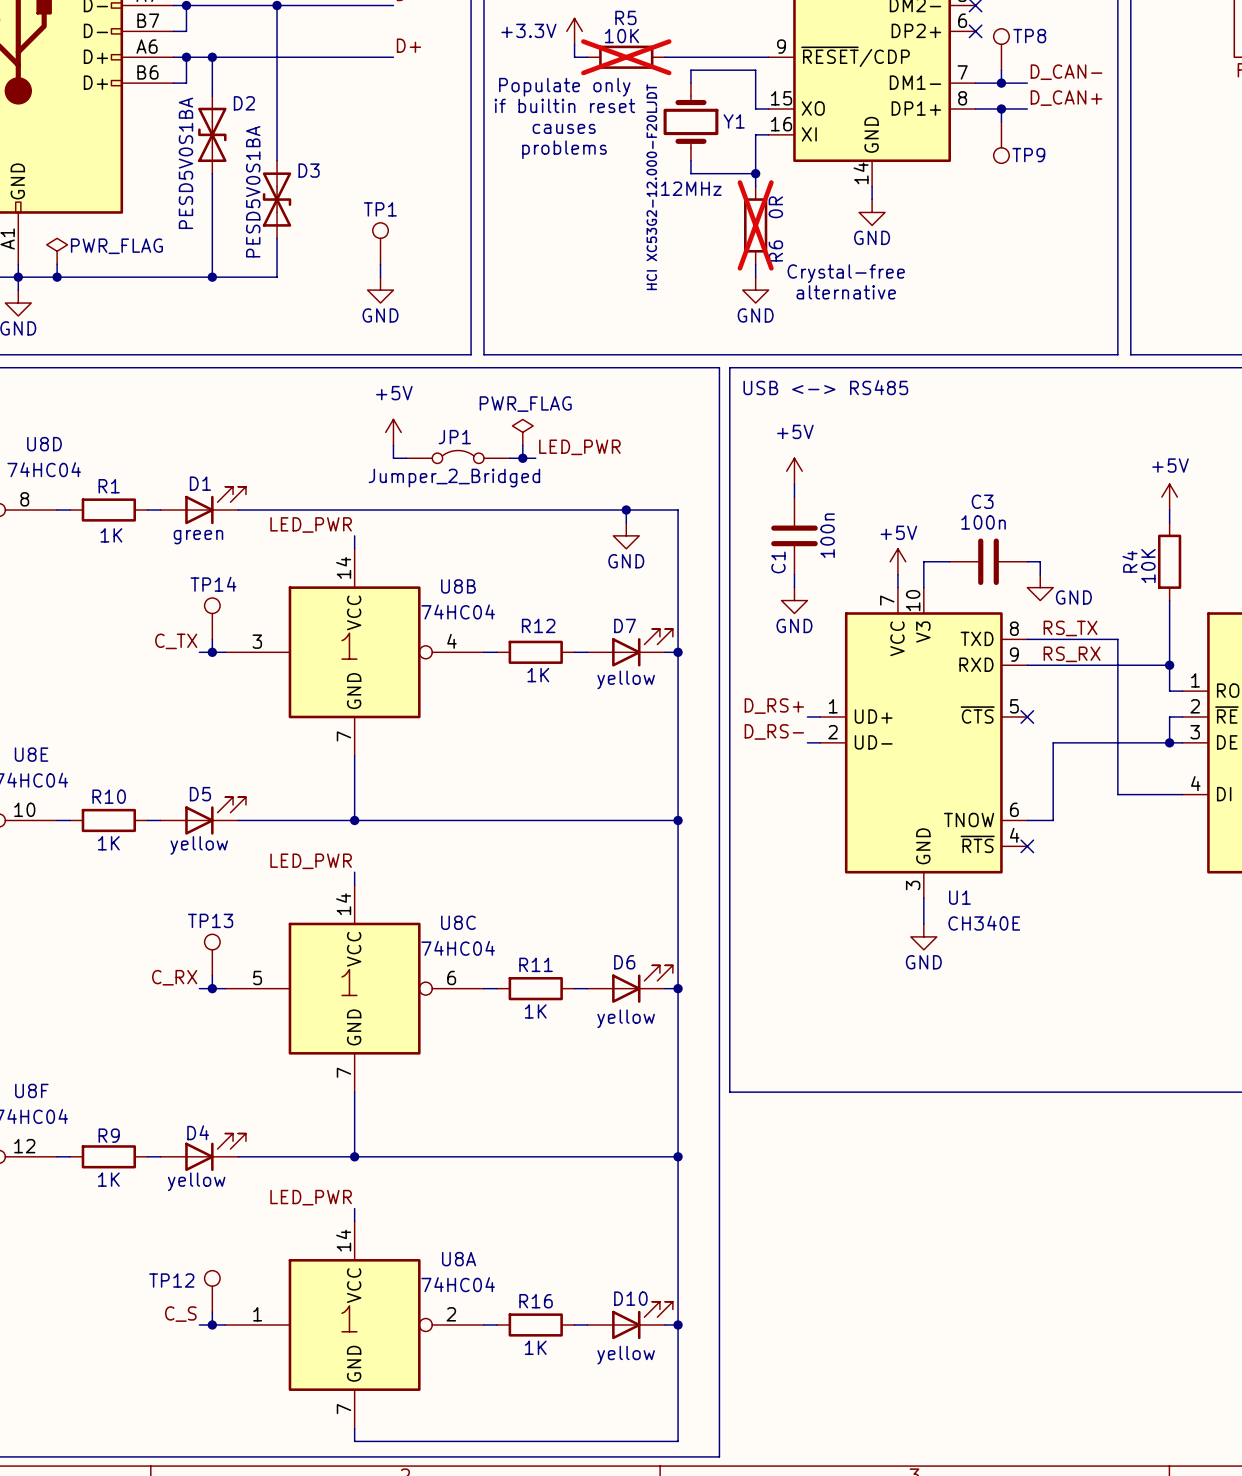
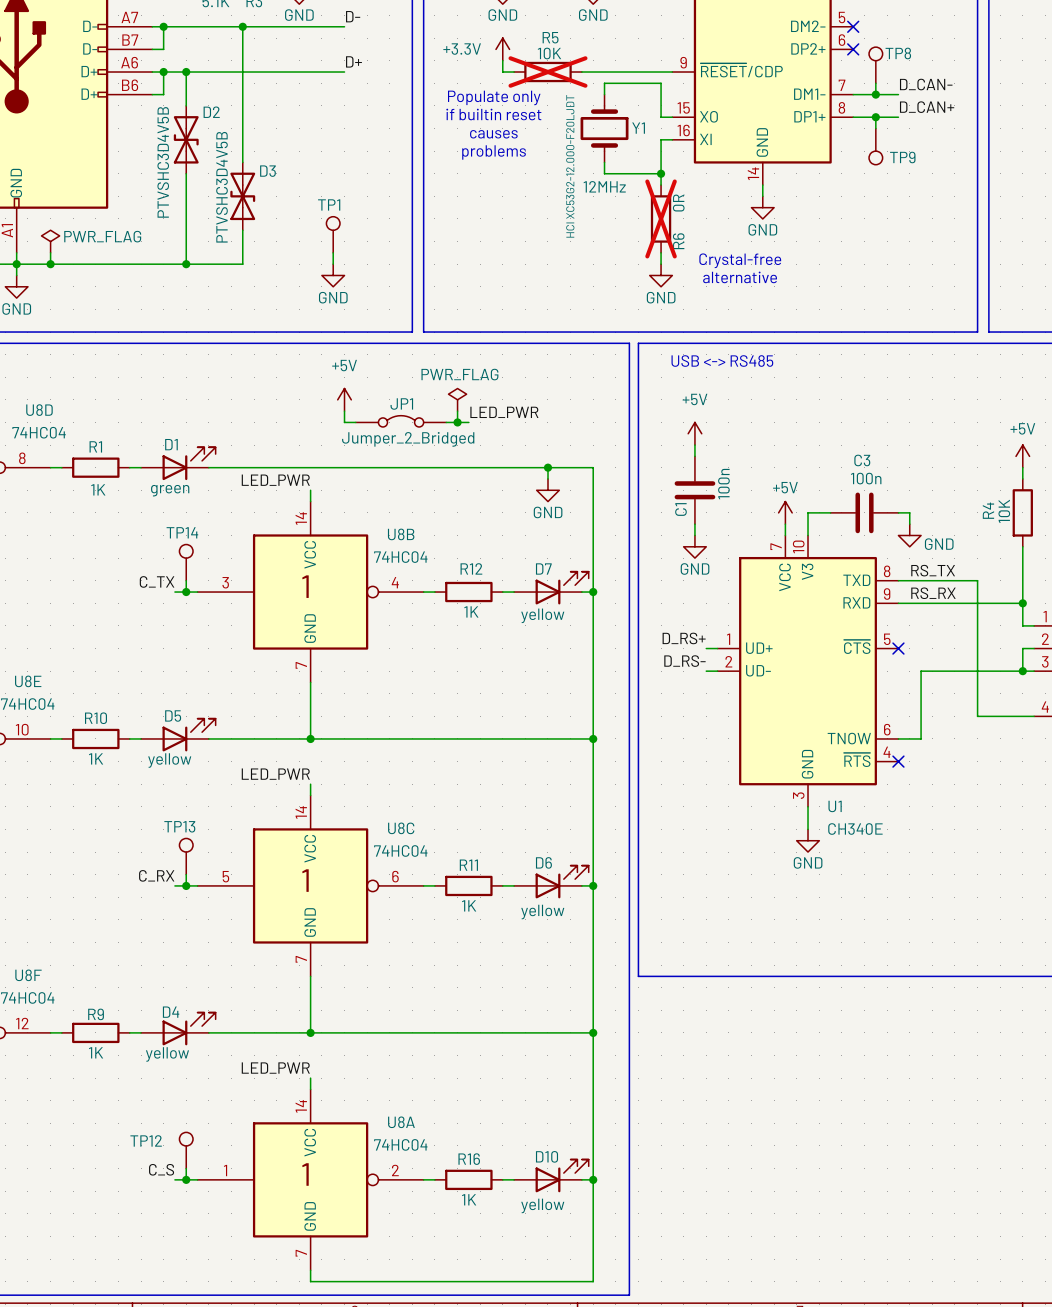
D2 value: PESD5V0S1BA (185, 163) -> PTVSHC3D4V5B (163, 162)
D3 value: PESD5V0S1BA (253, 191) -> PTVSHC3D4V5B (222, 187)

